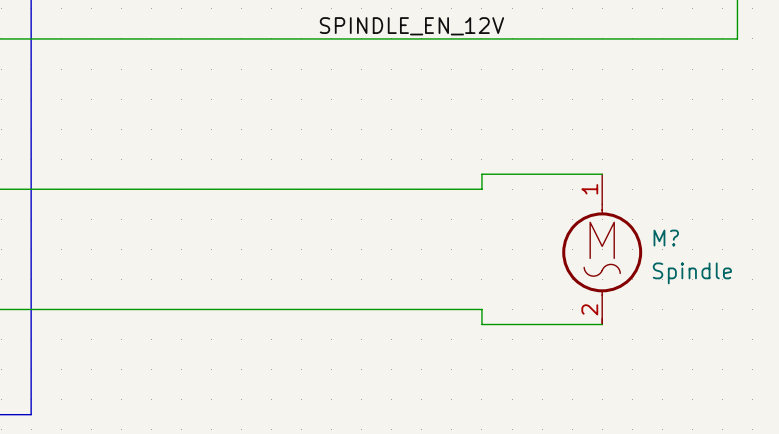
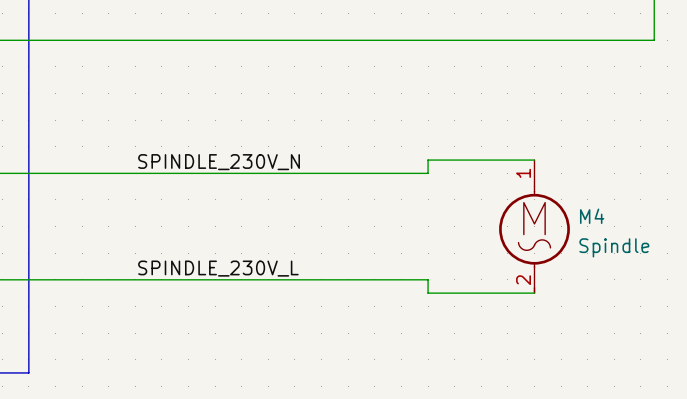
label: SPINDLE_EN_12V (411, 26) -> none
label: none -> SPINDLE_230V_N (219, 162)
M? name: M? (666, 238) -> M4 (592, 216)
label: none -> SPINDLE_230V_L (218, 268)

